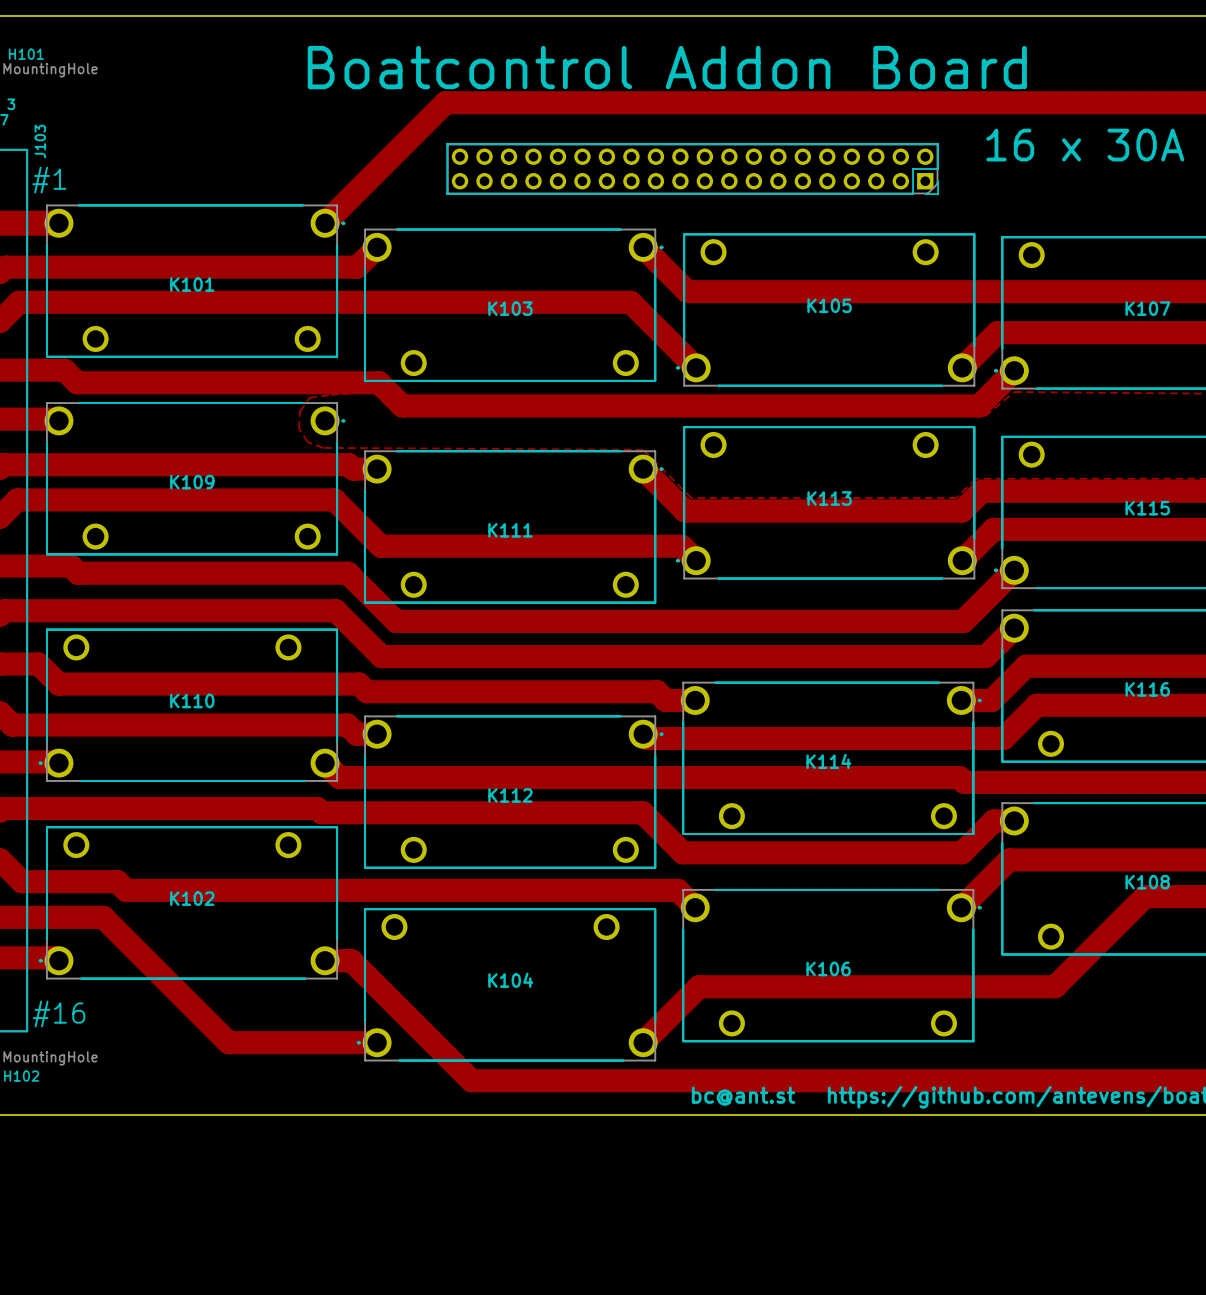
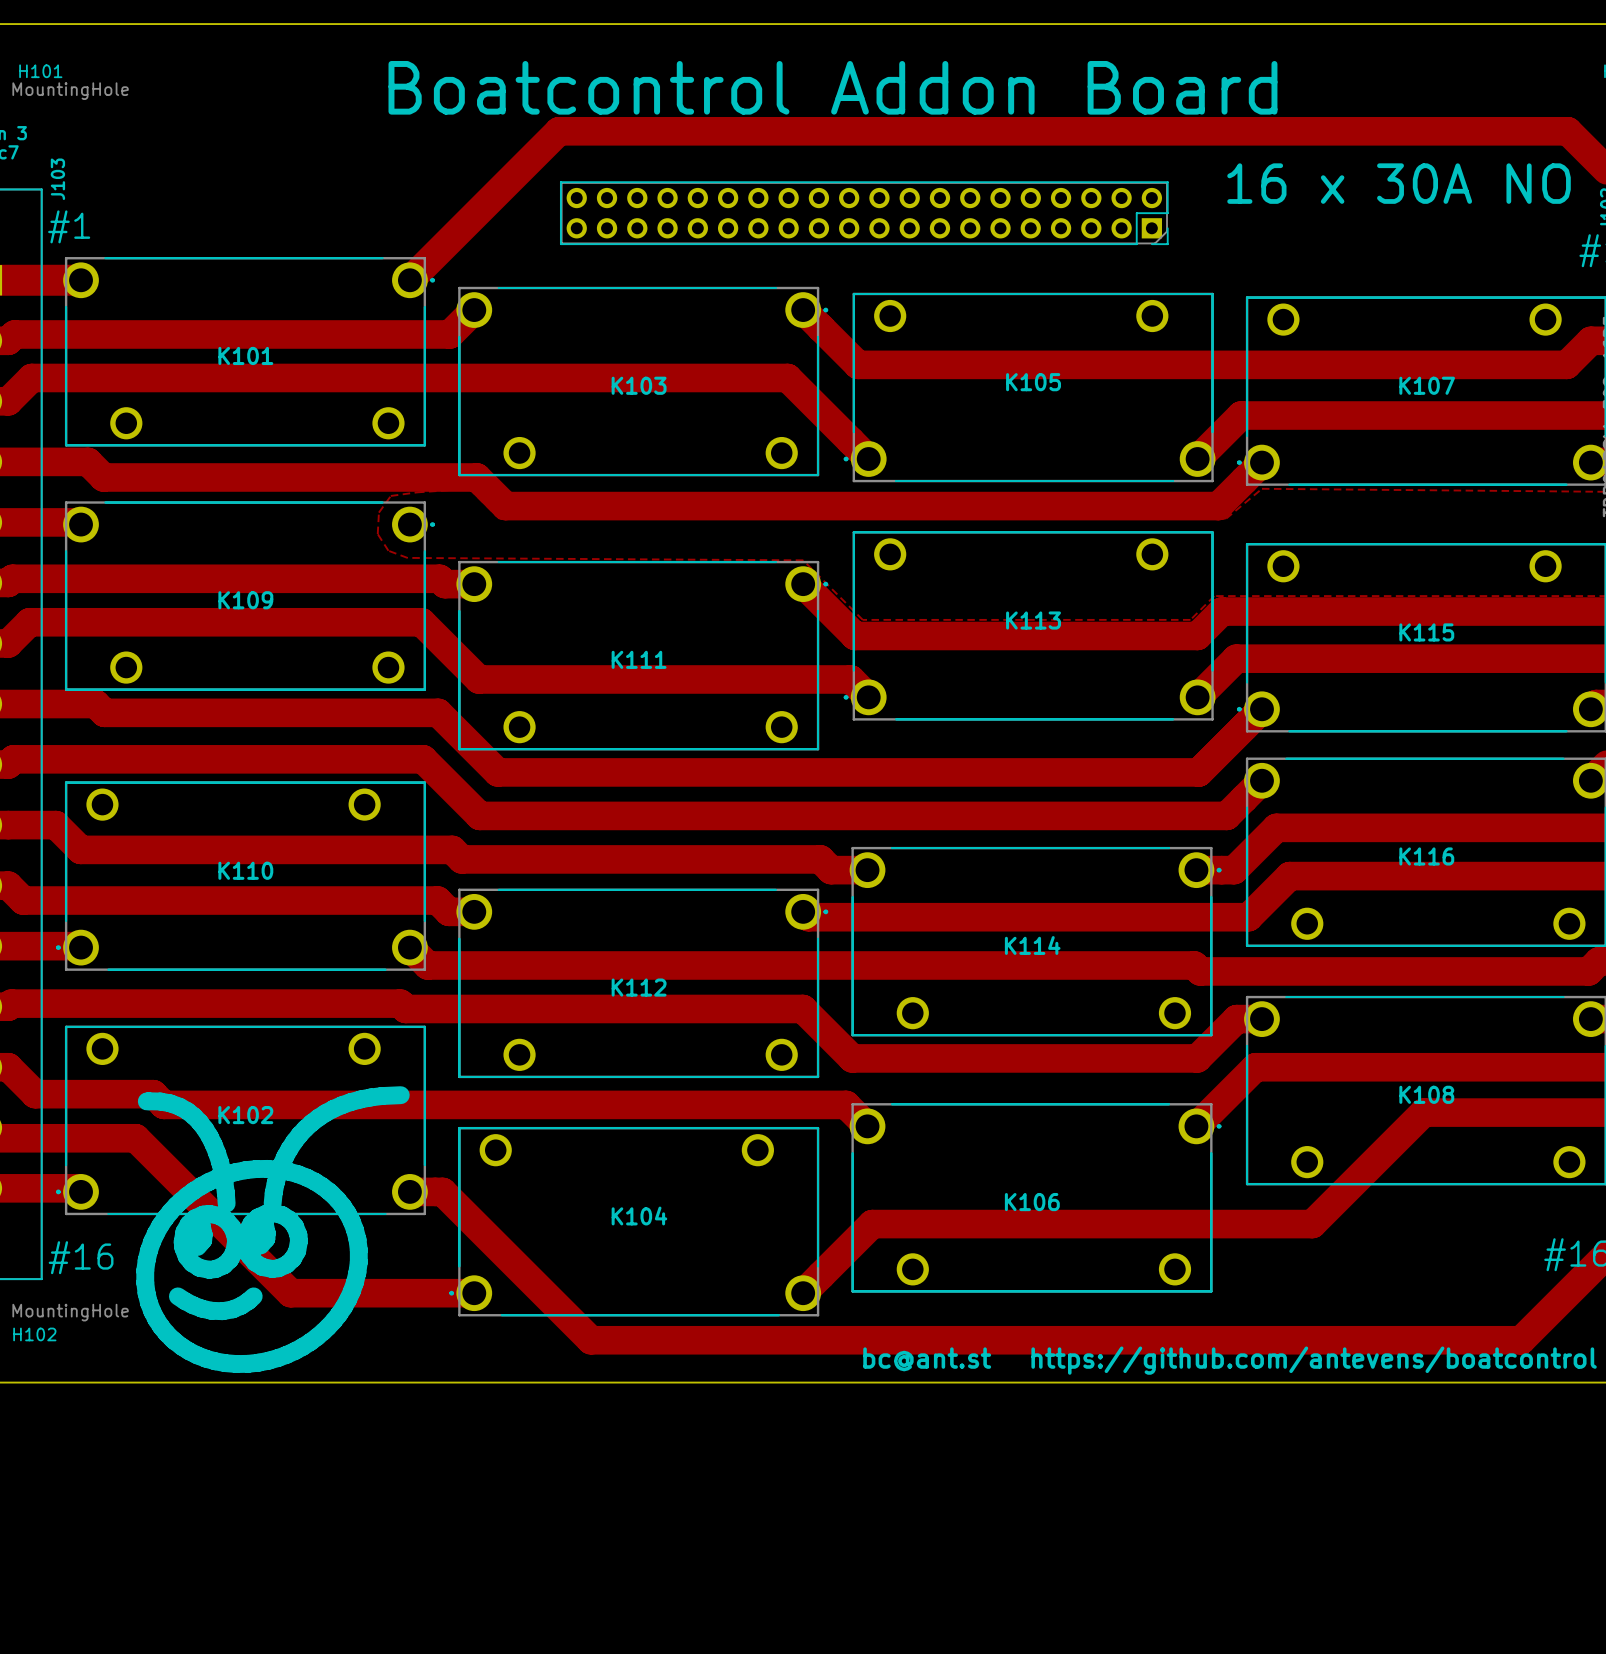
drawing: none -> [136, 1086, 410, 1373]

